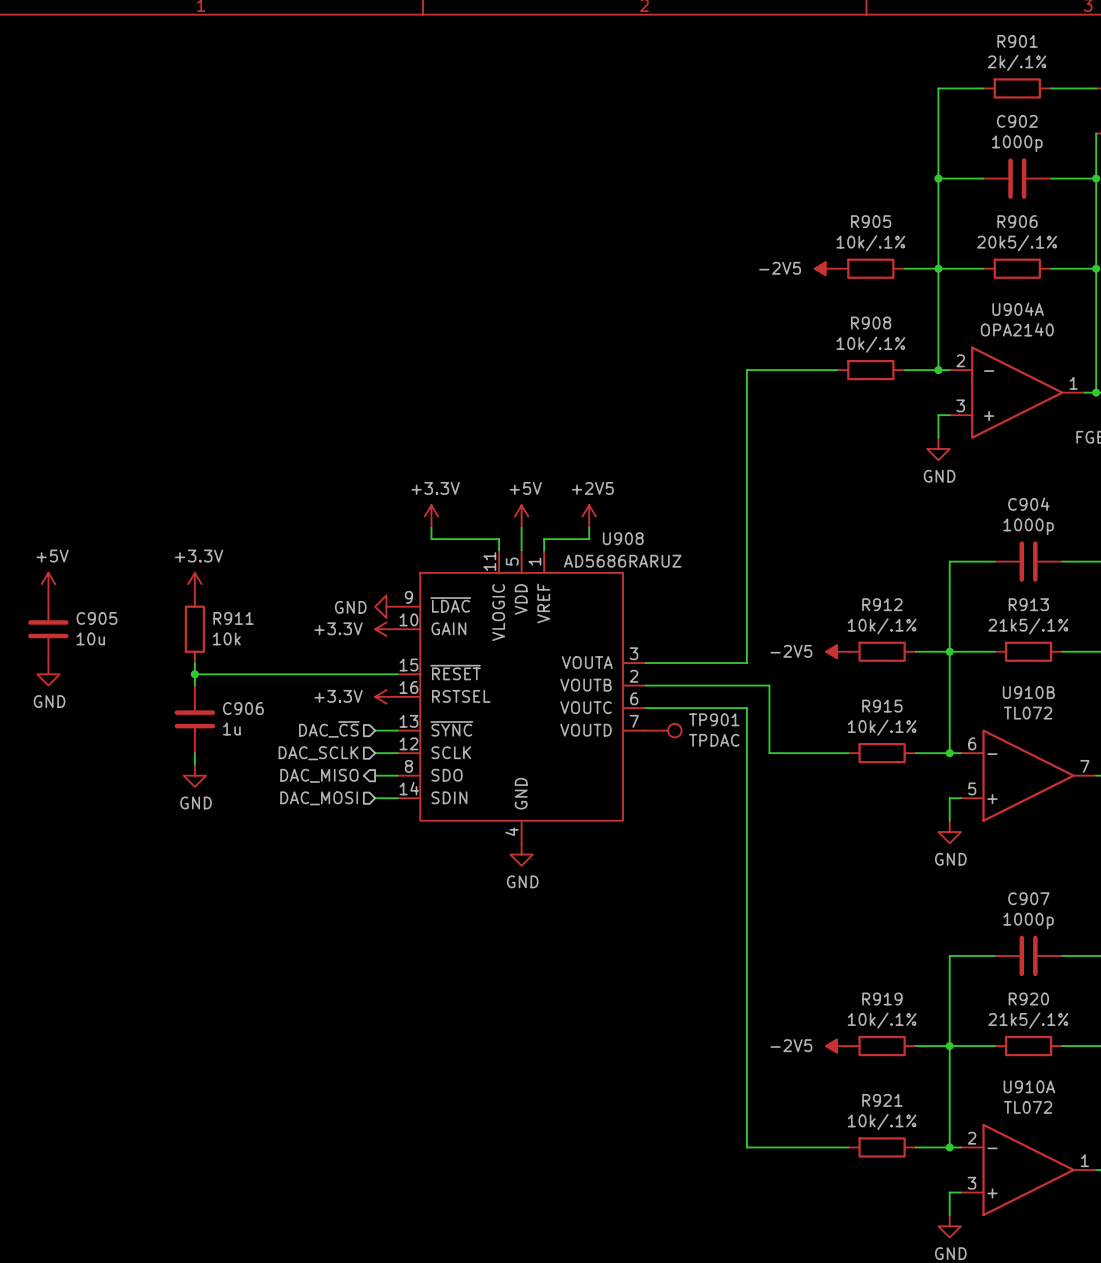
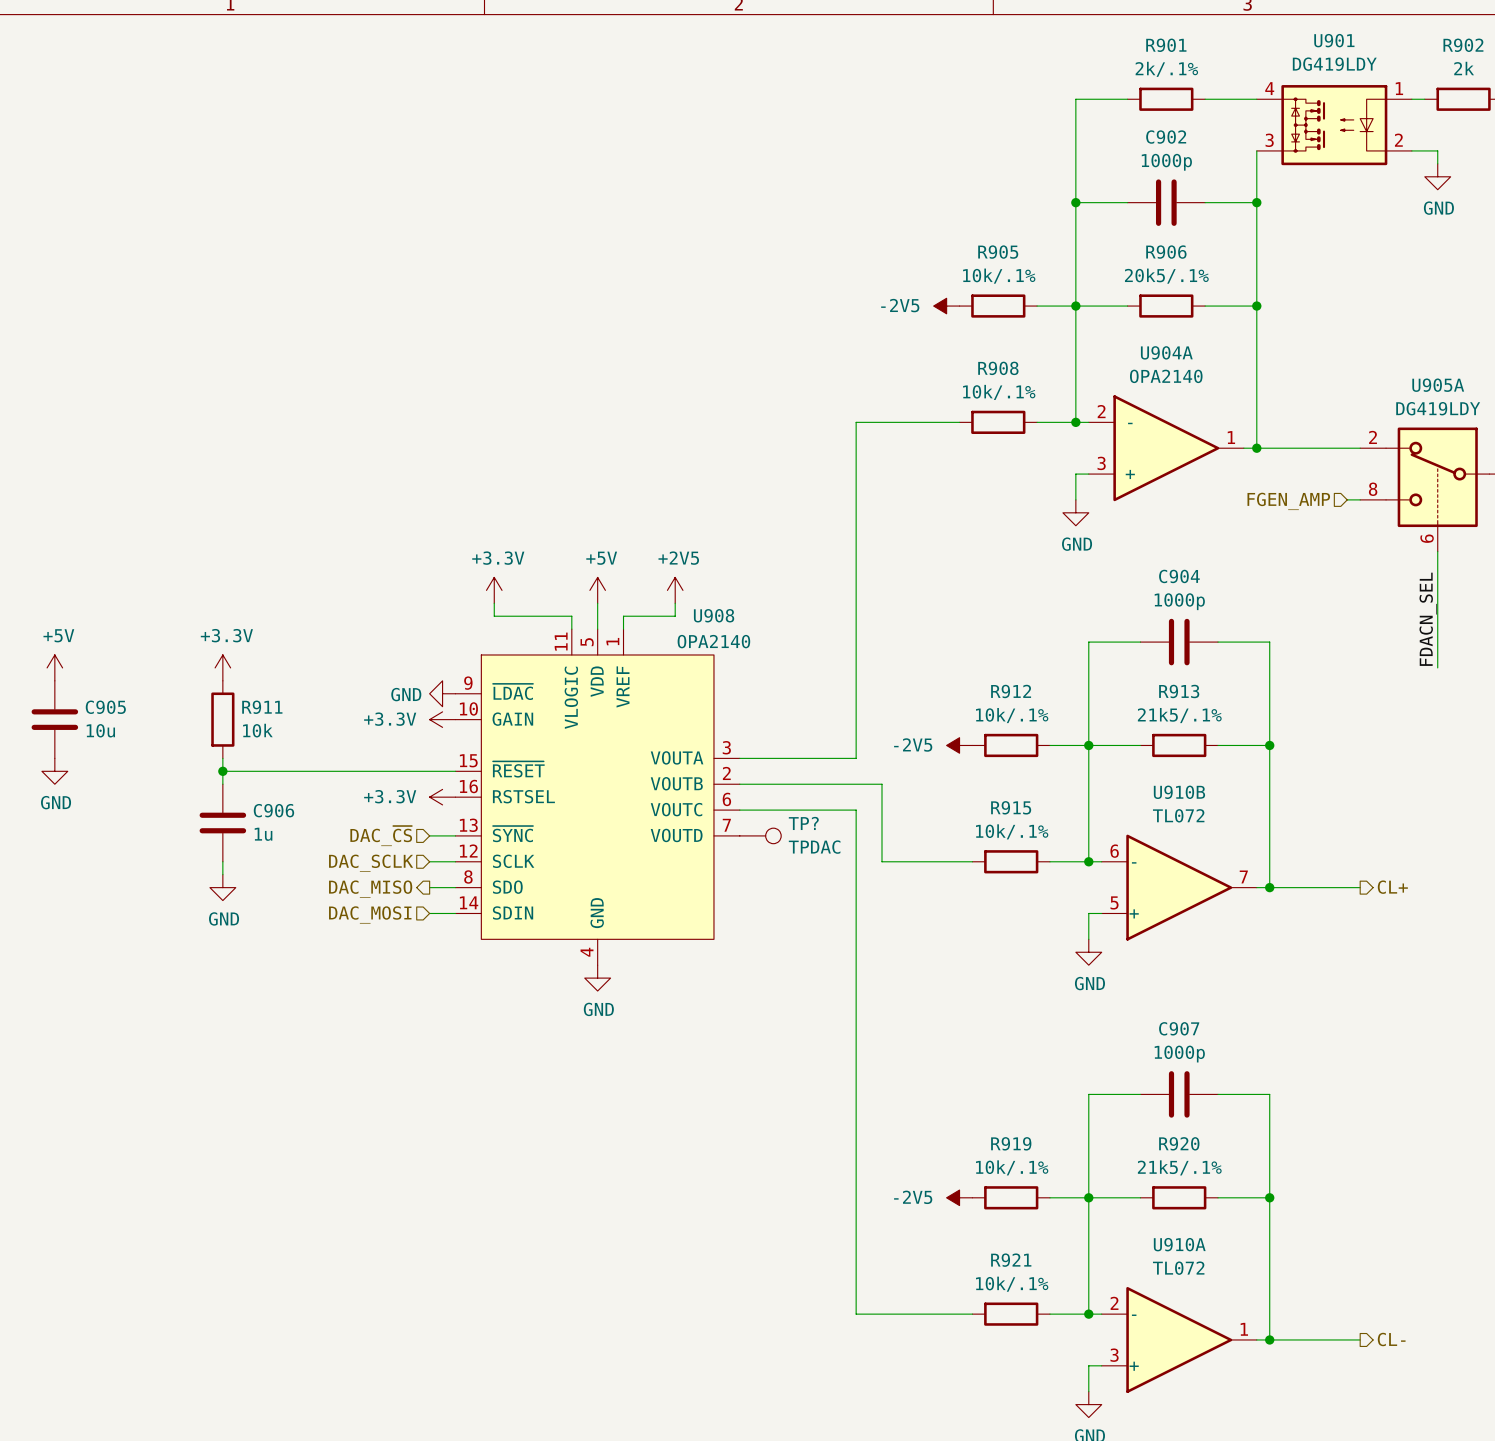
U908 value: AD5686RARUZ (622, 561) -> OPA2140 (713, 641)
TP901 name: TP901 (714, 719) -> TP? (803, 823)

